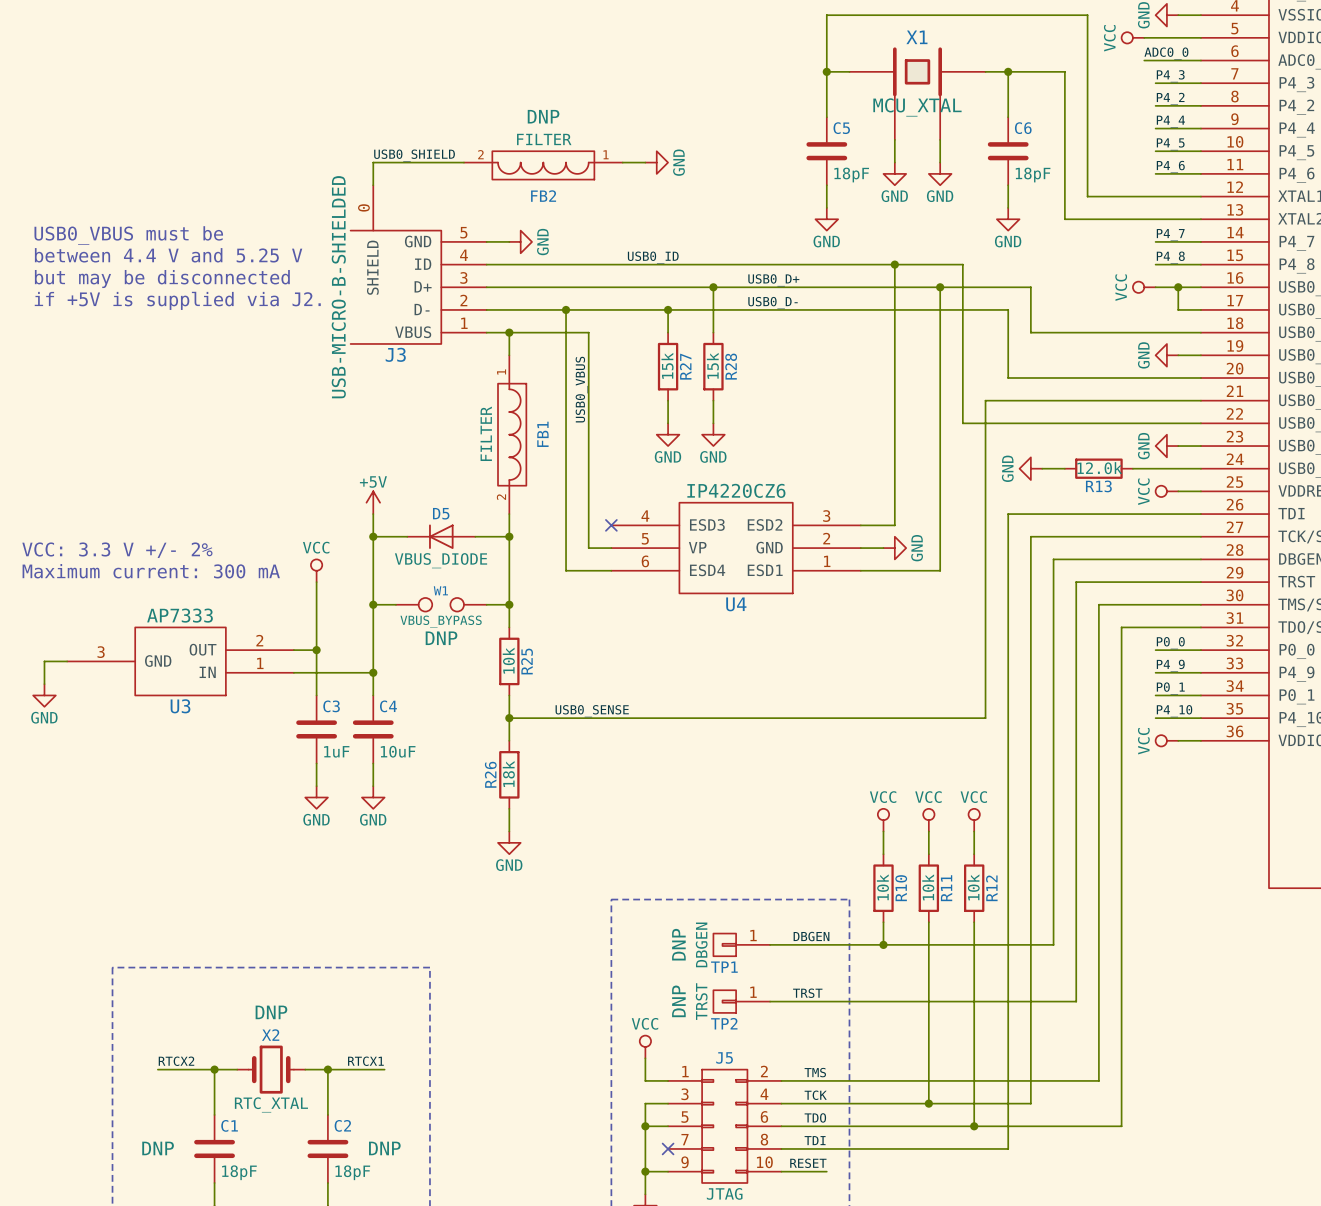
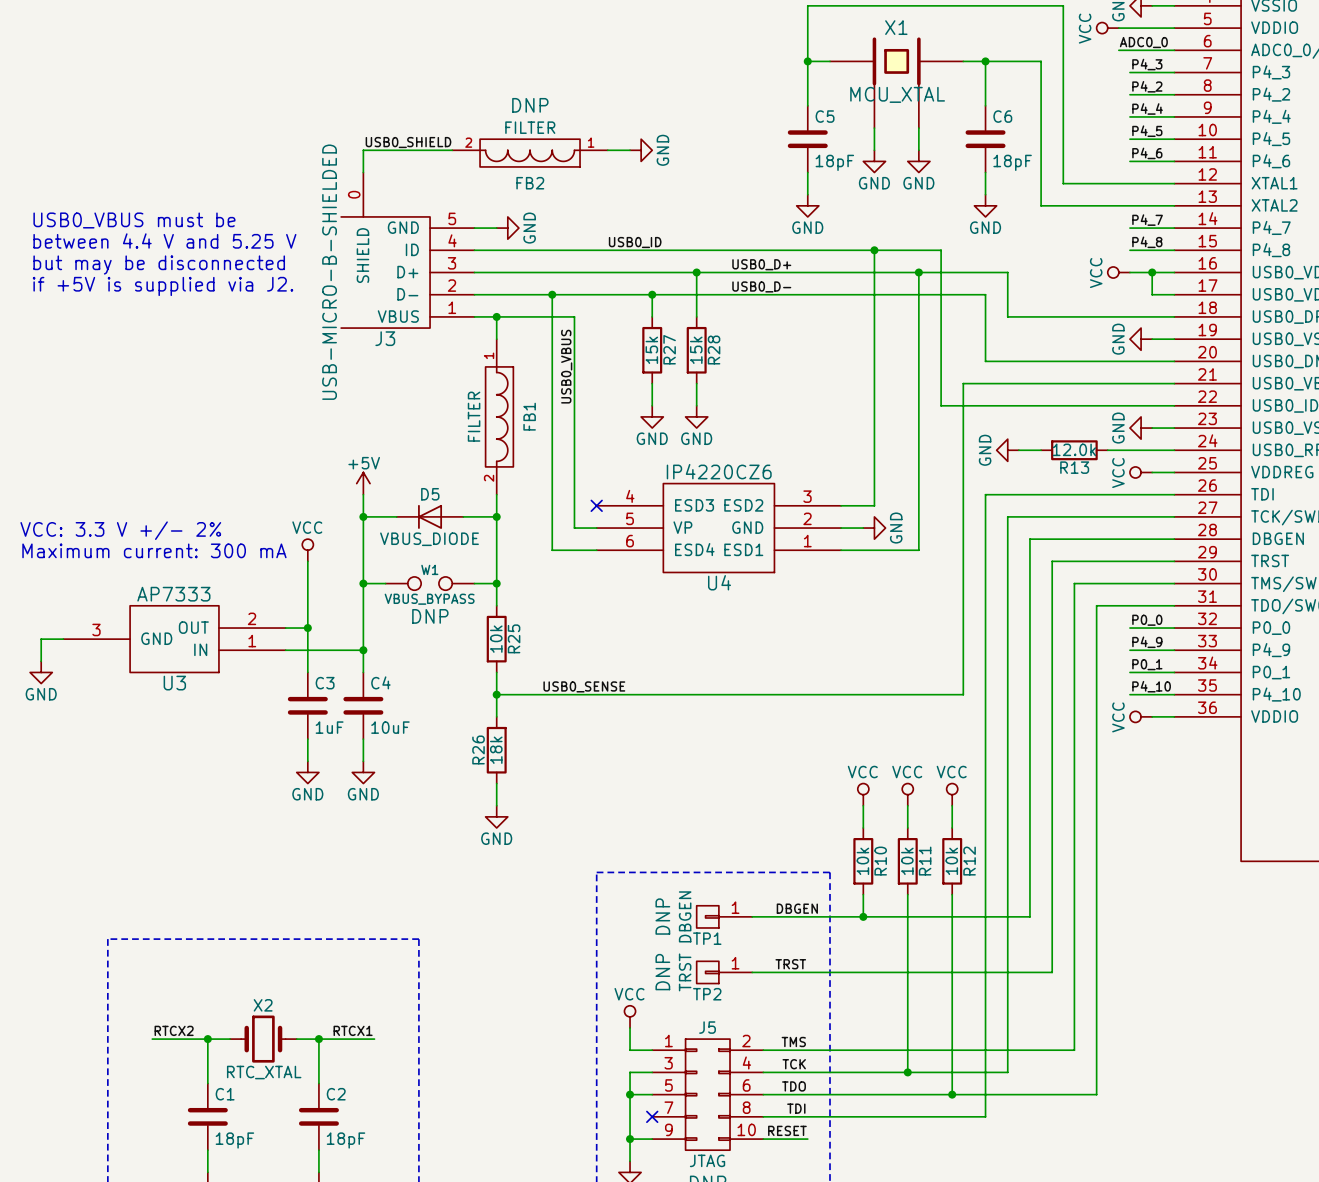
X2 text: DNP (271, 1012) -> none
C1 text: DNP (158, 1148) -> none
C2 text: DNP (384, 1148) -> none

